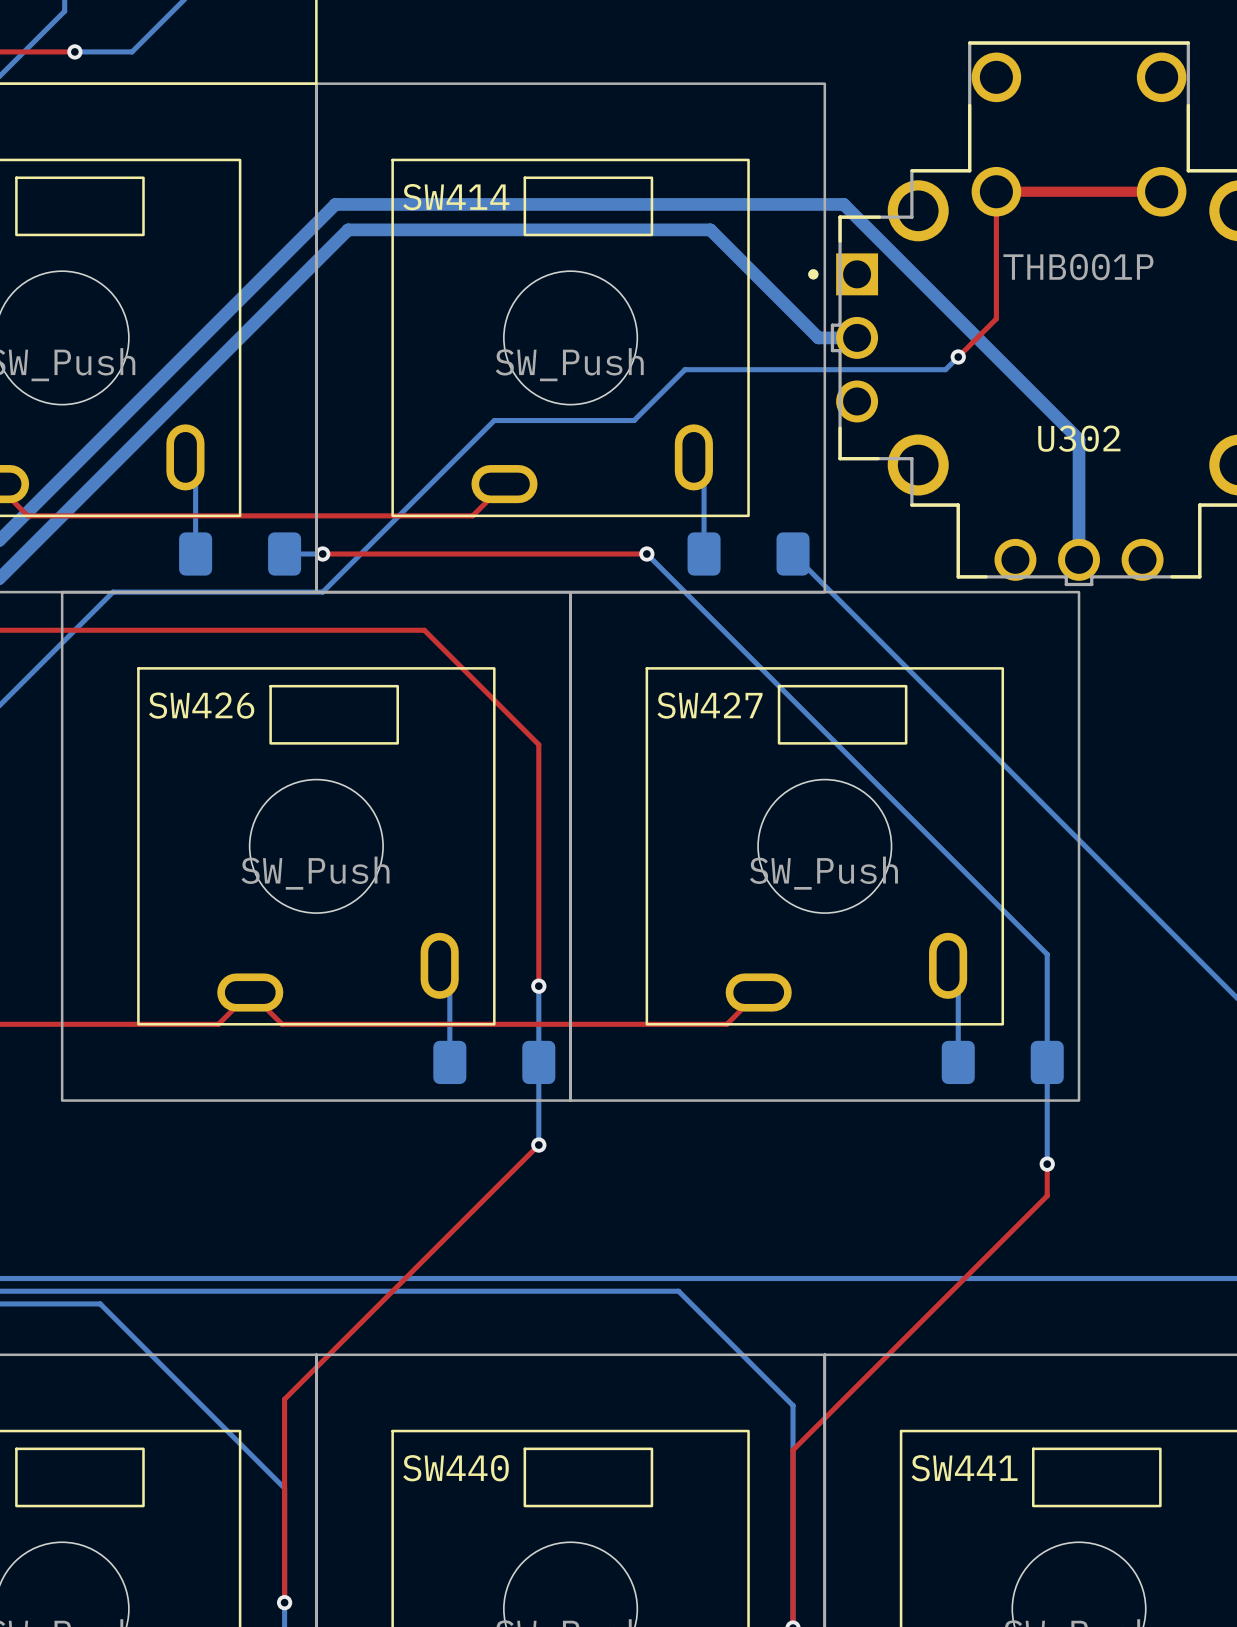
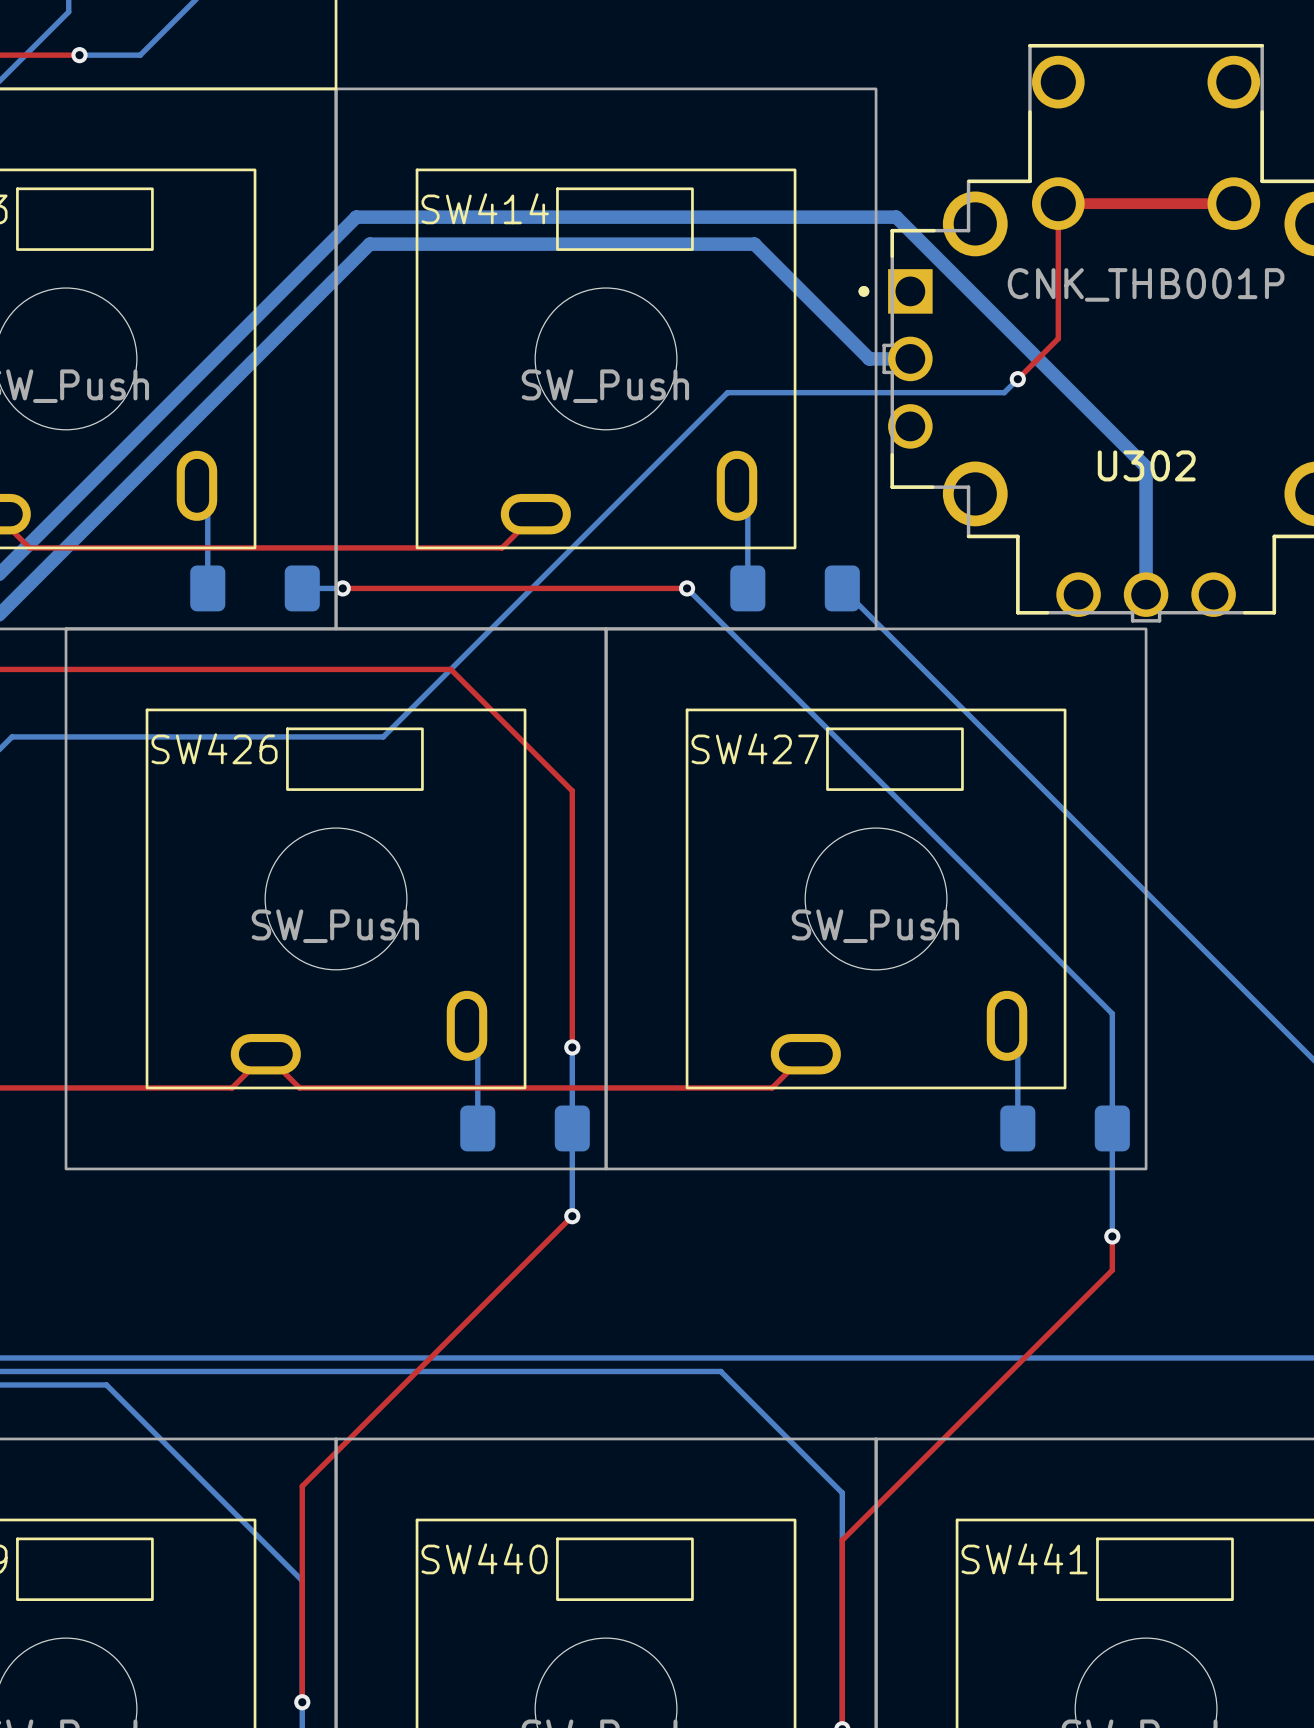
U302 value: THB001P (1078, 267) -> CNK_THB001P (1146, 284)
bottom track: (634, 420) (494, 420) (322, 592) (112, 592) (11, 693) -> (673, 446) (383, 736) (12, 736)

